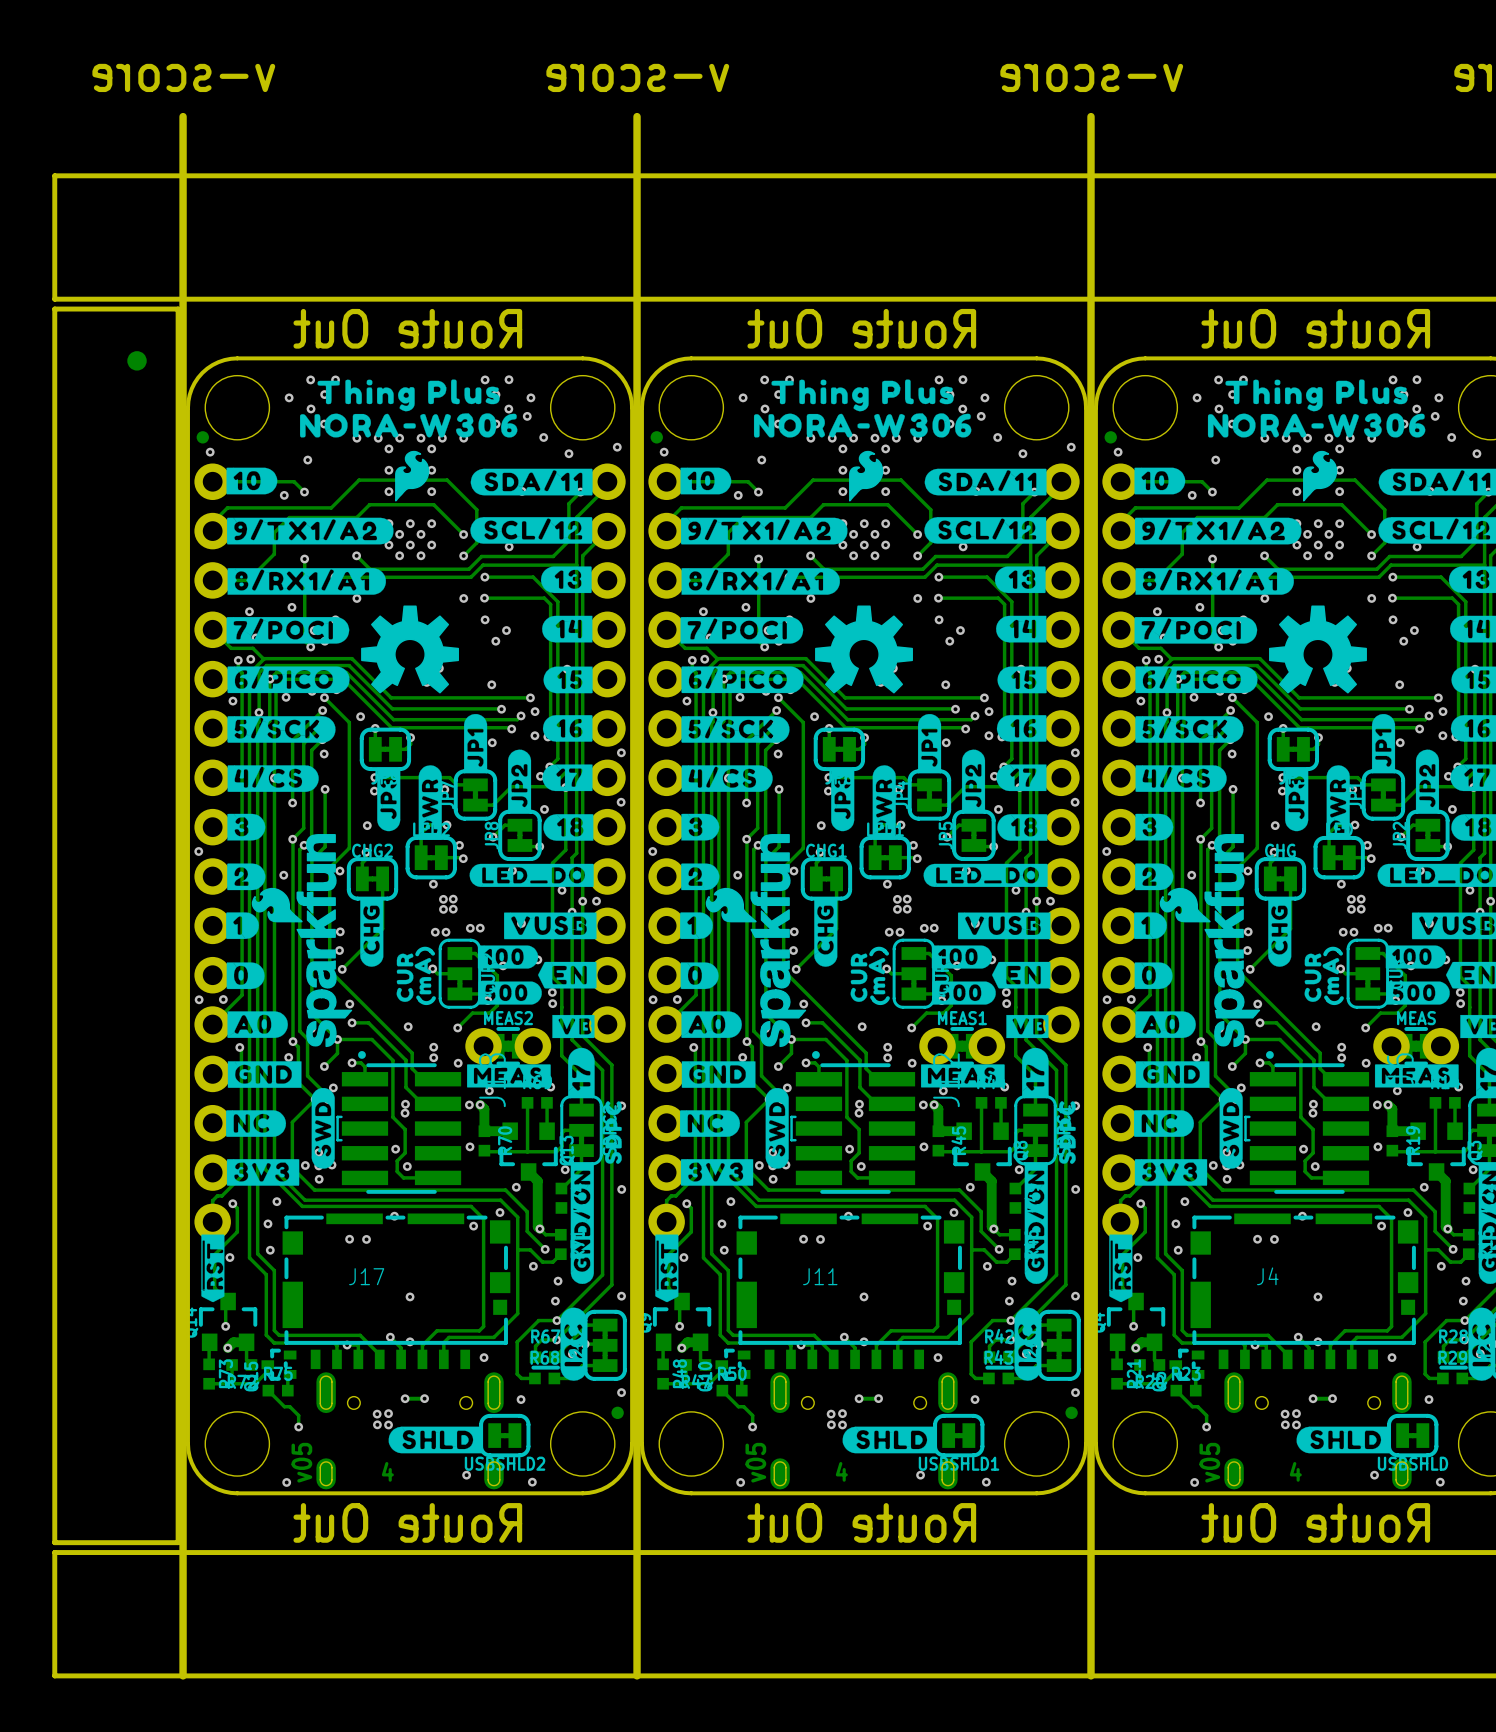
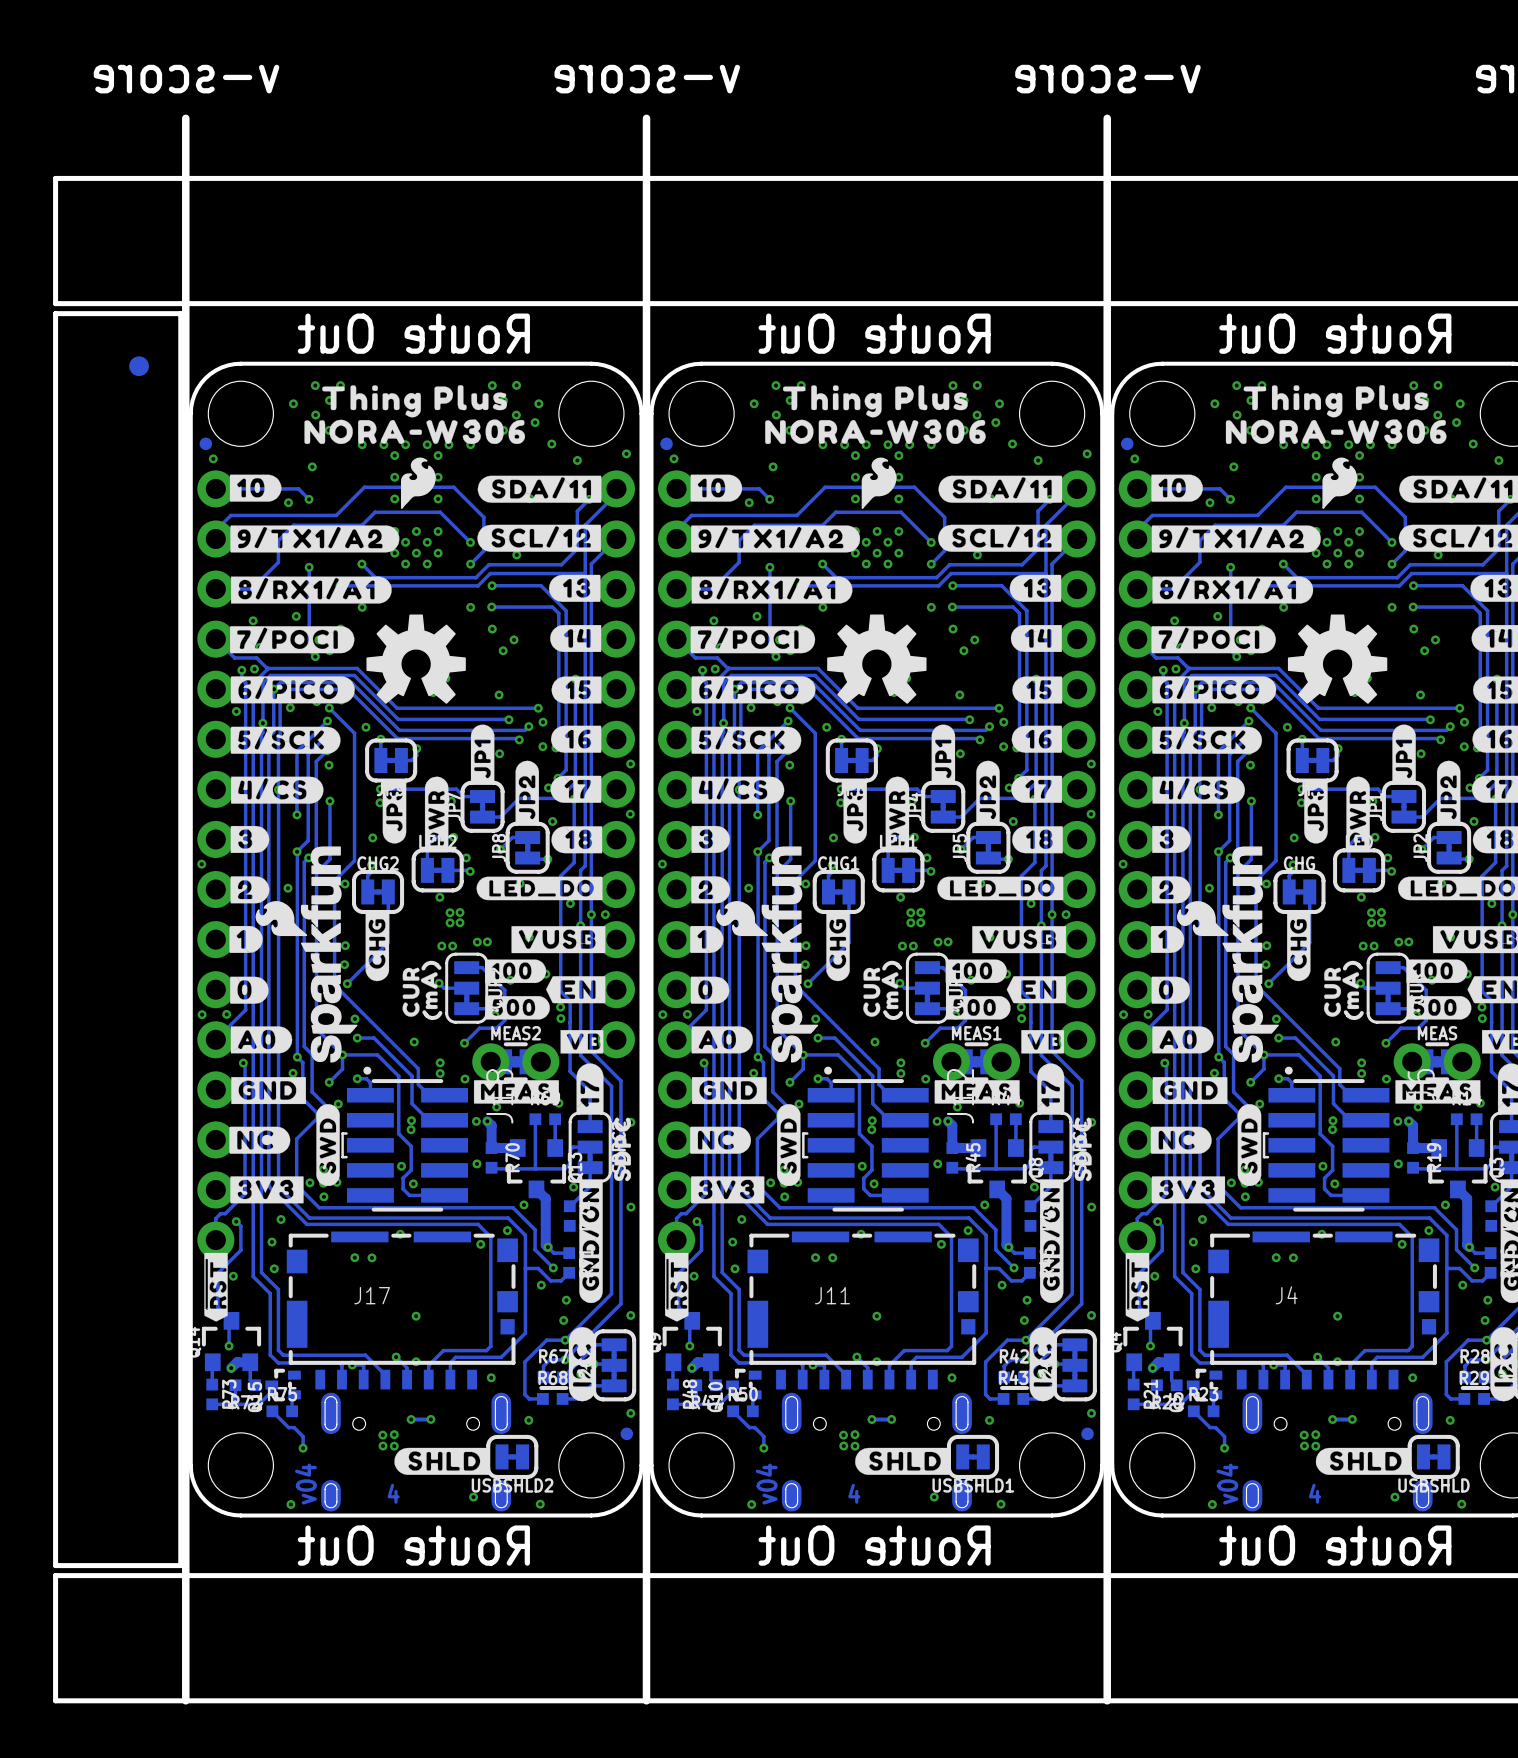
text: v05 (301, 1462) -> v04 (305, 1484)
text: v05 (755, 1462) -> v04 (766, 1484)
text: v05 (1209, 1462) -> v04 (1227, 1484)

